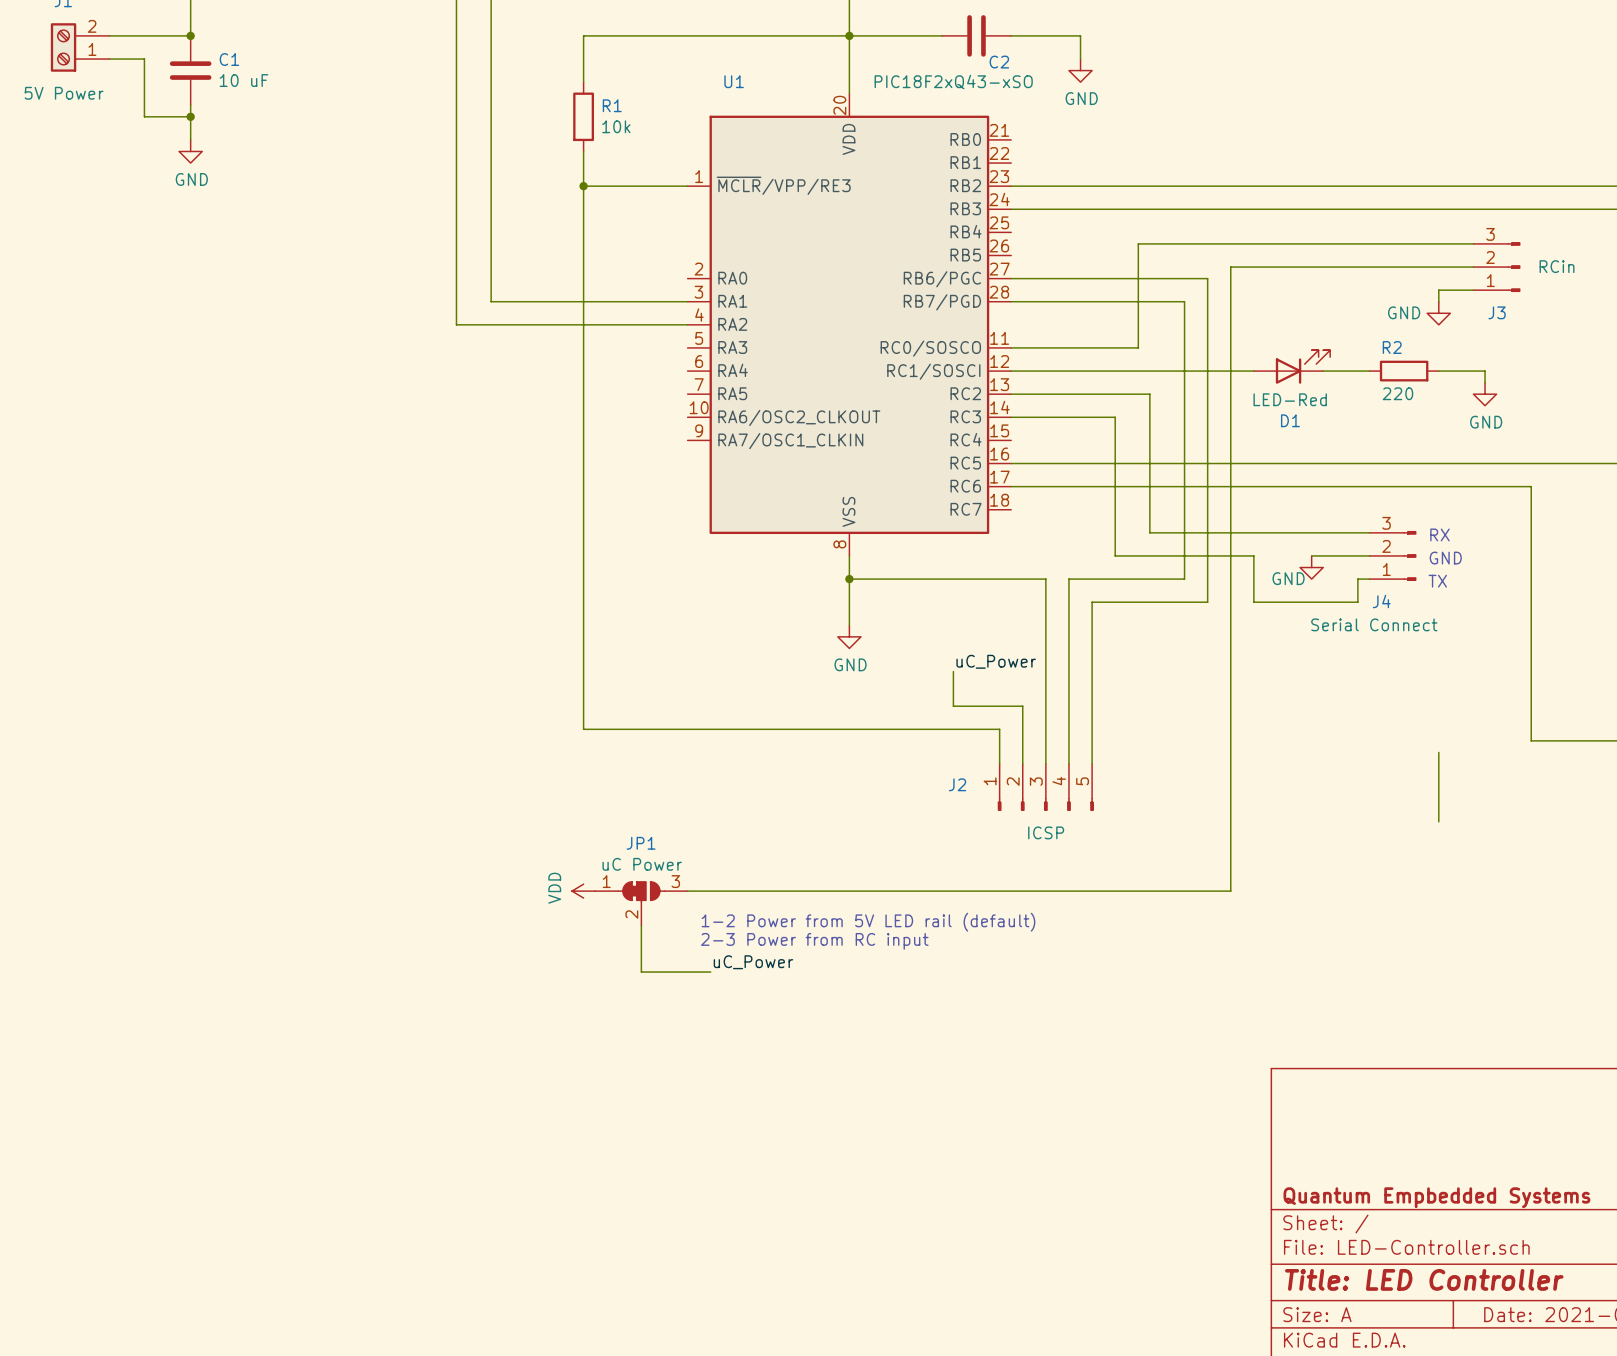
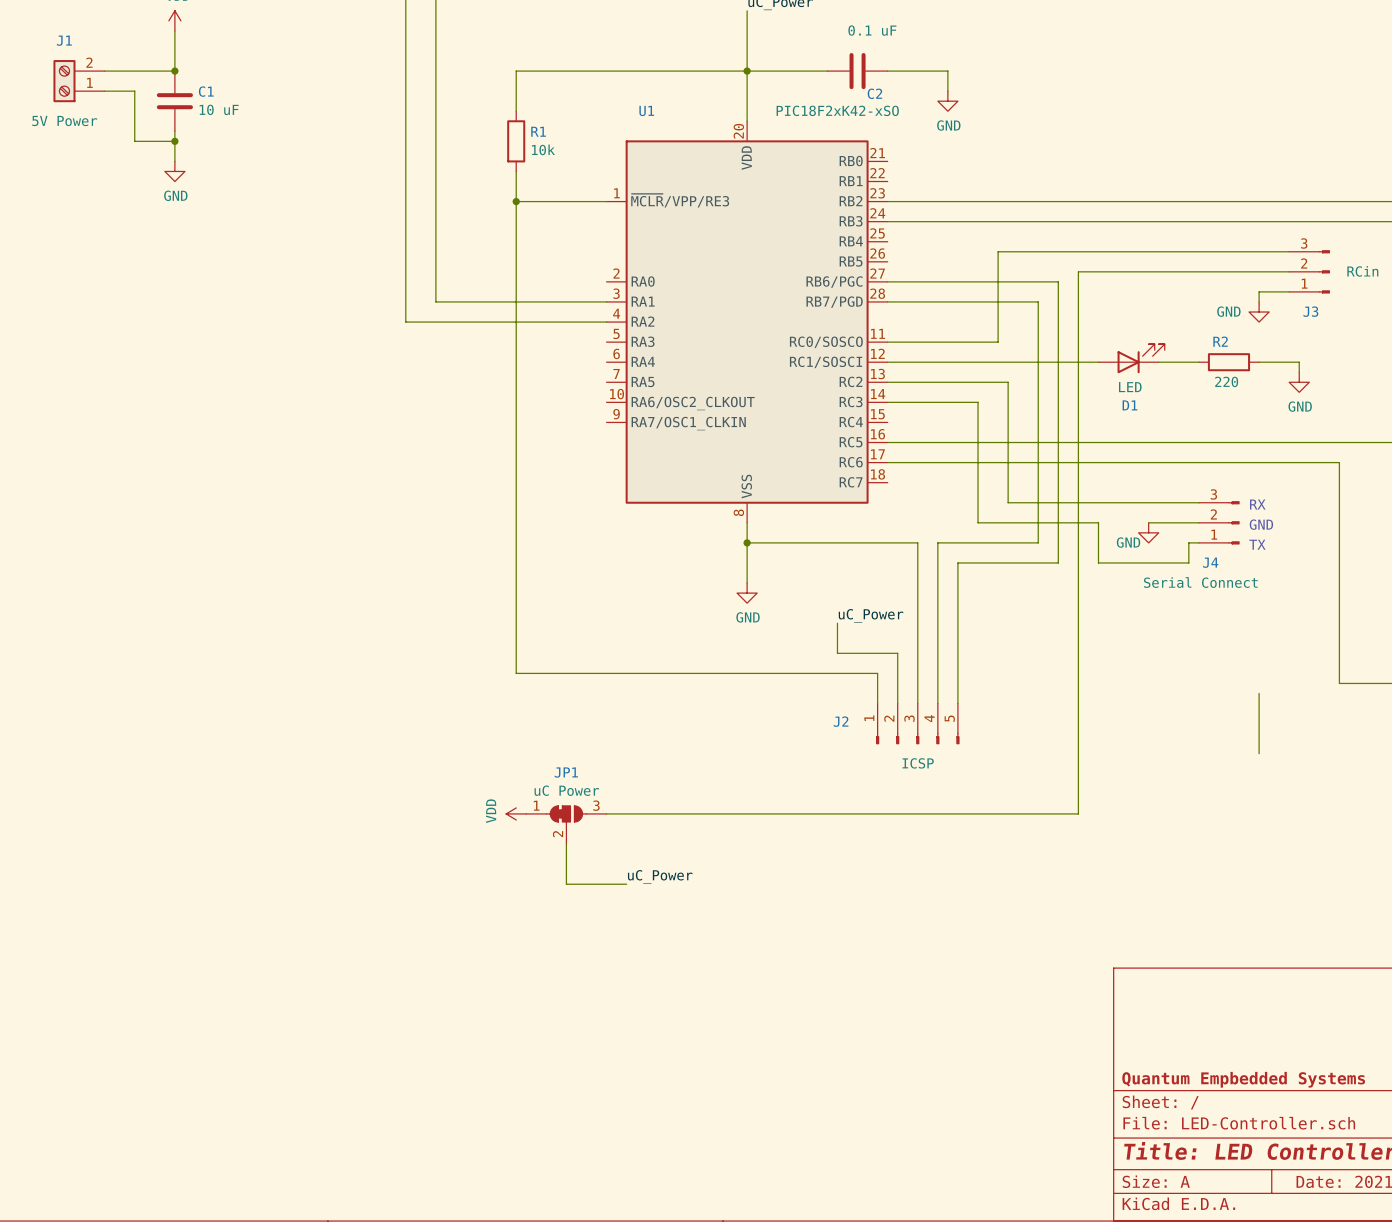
U1 value: PIC18F2xQ43-xSO (953, 81) -> PIC18F2xK42-xSO (837, 110)
D1 value: LED-Red (1290, 399) -> LED (1130, 387)
text: 1-2 Power from 5V LED rail (default) (868, 922) -> none
text: 2-3 Power from RC input (814, 941) -> none

